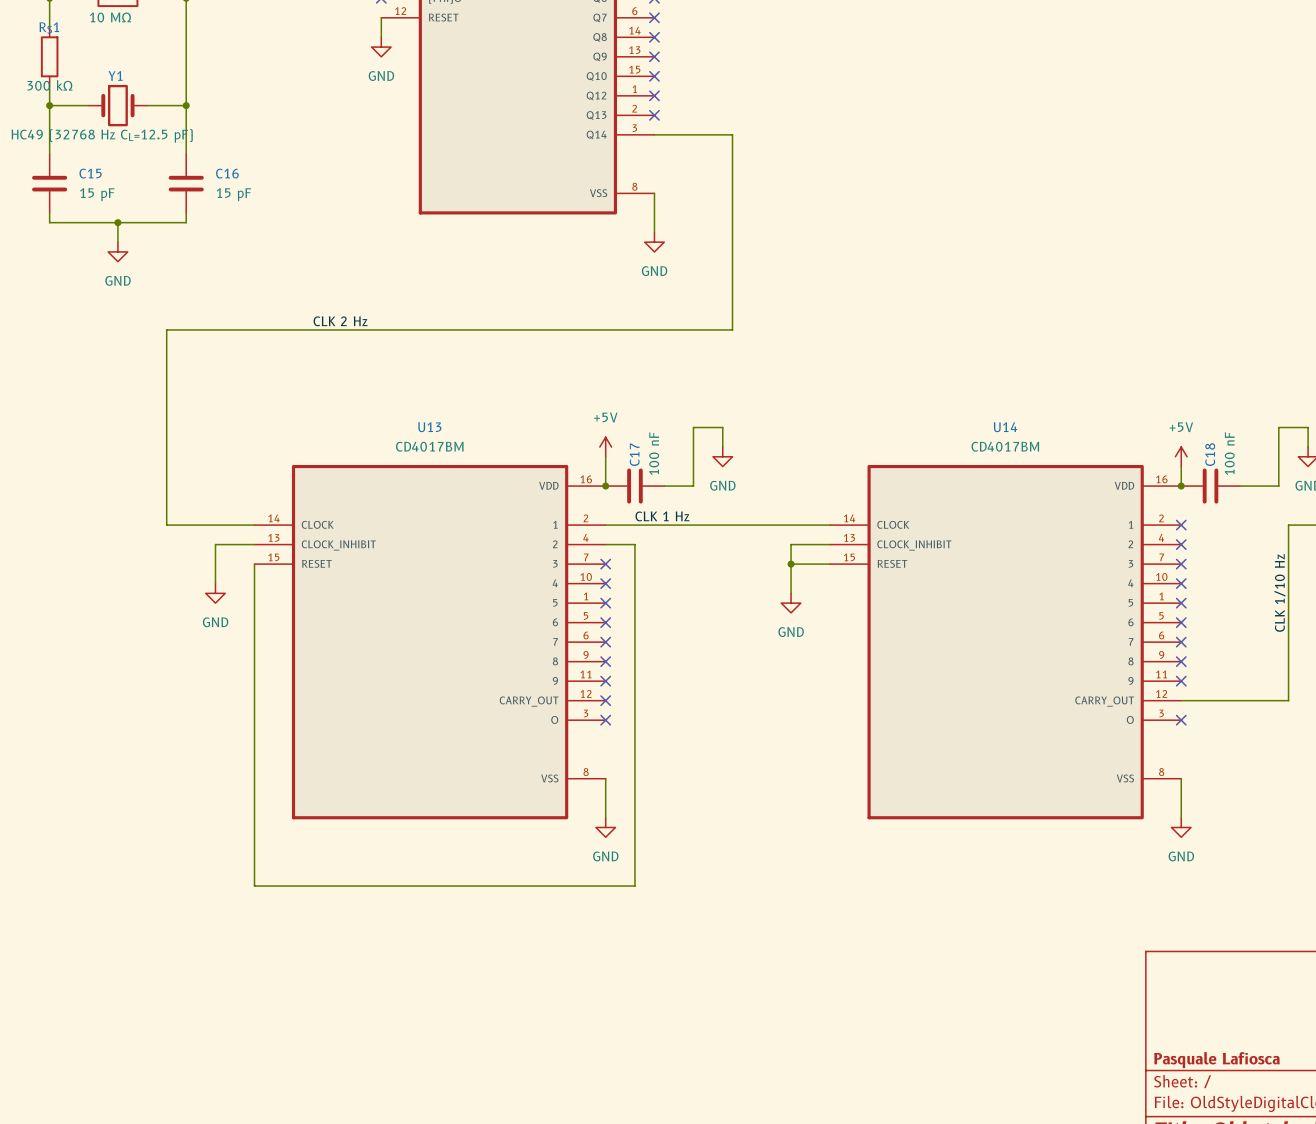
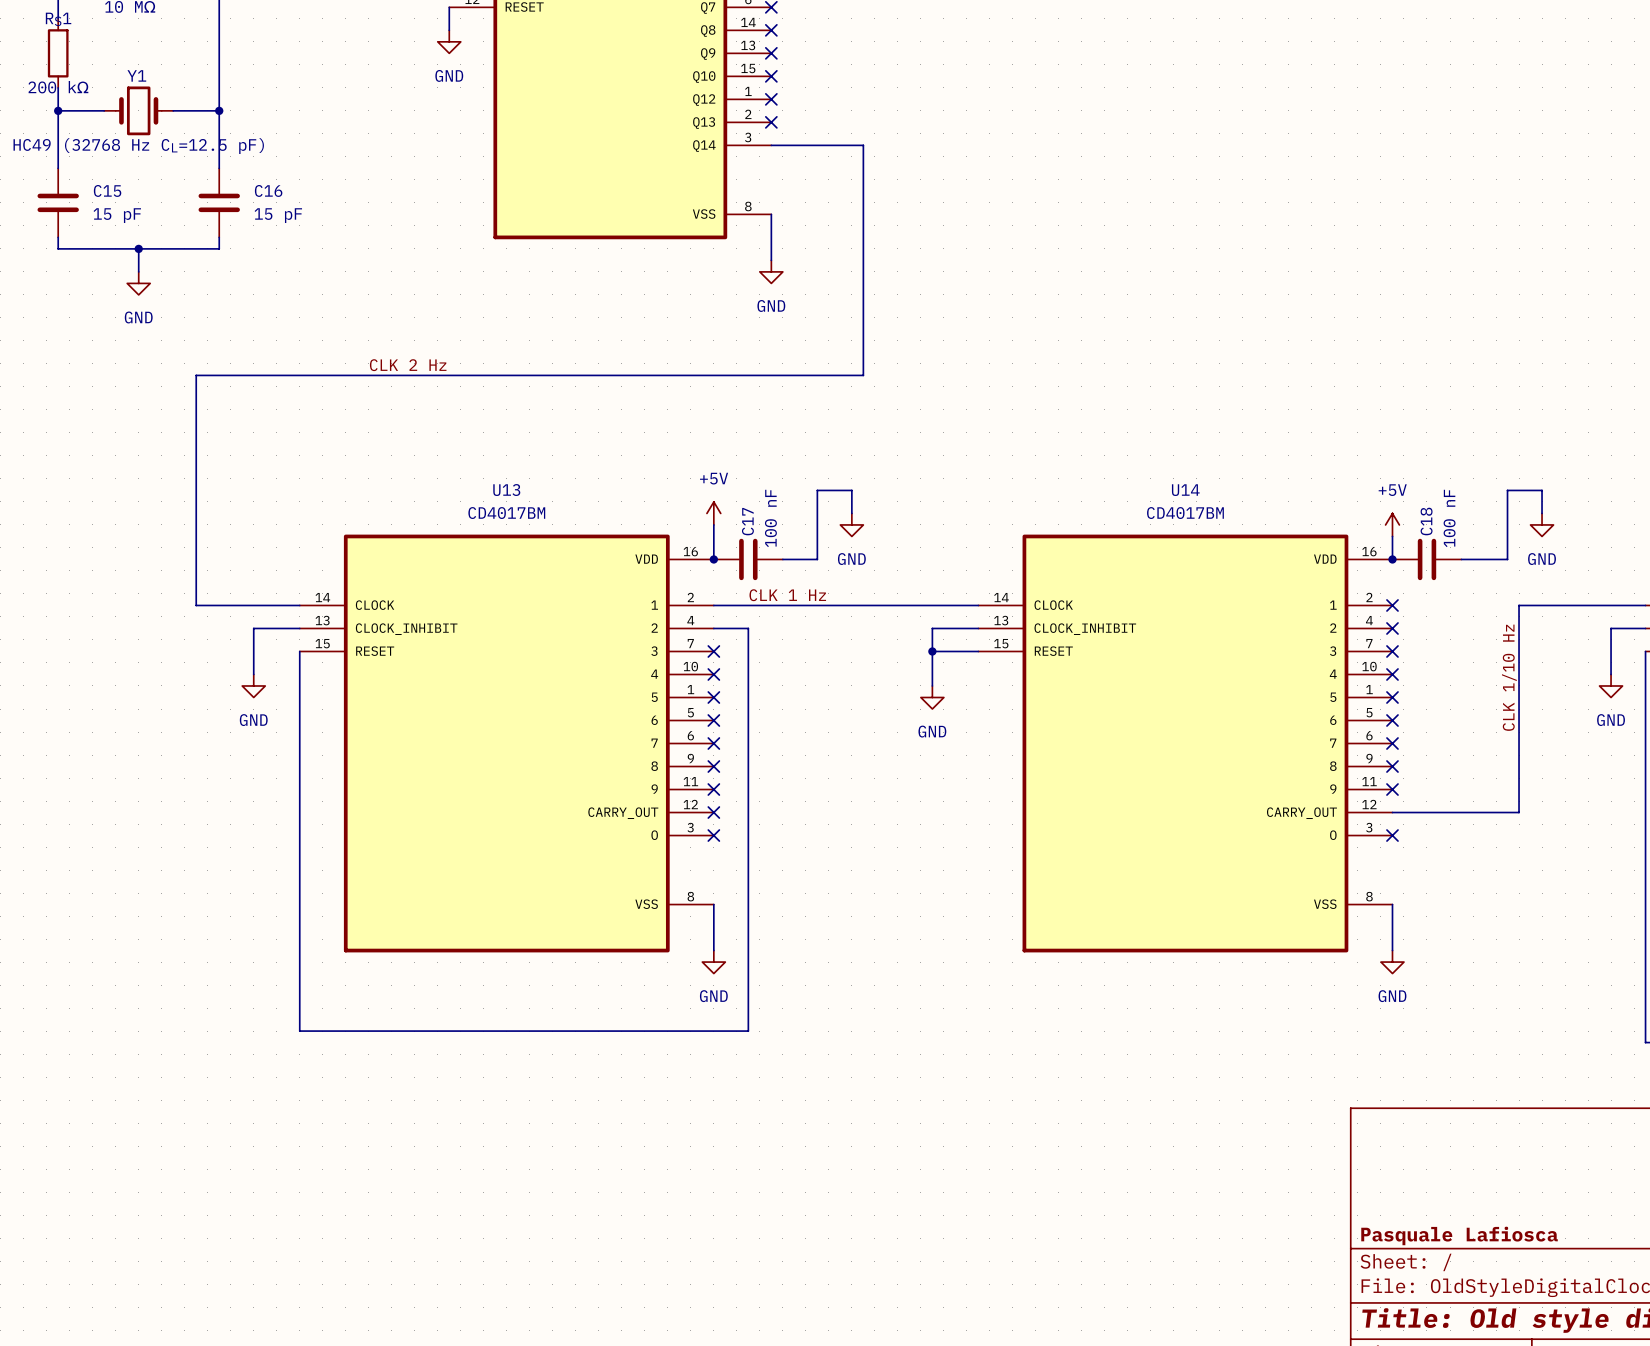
RS1 value: 300 kΩ (49, 85) -> 200 kΩ (58, 87)

